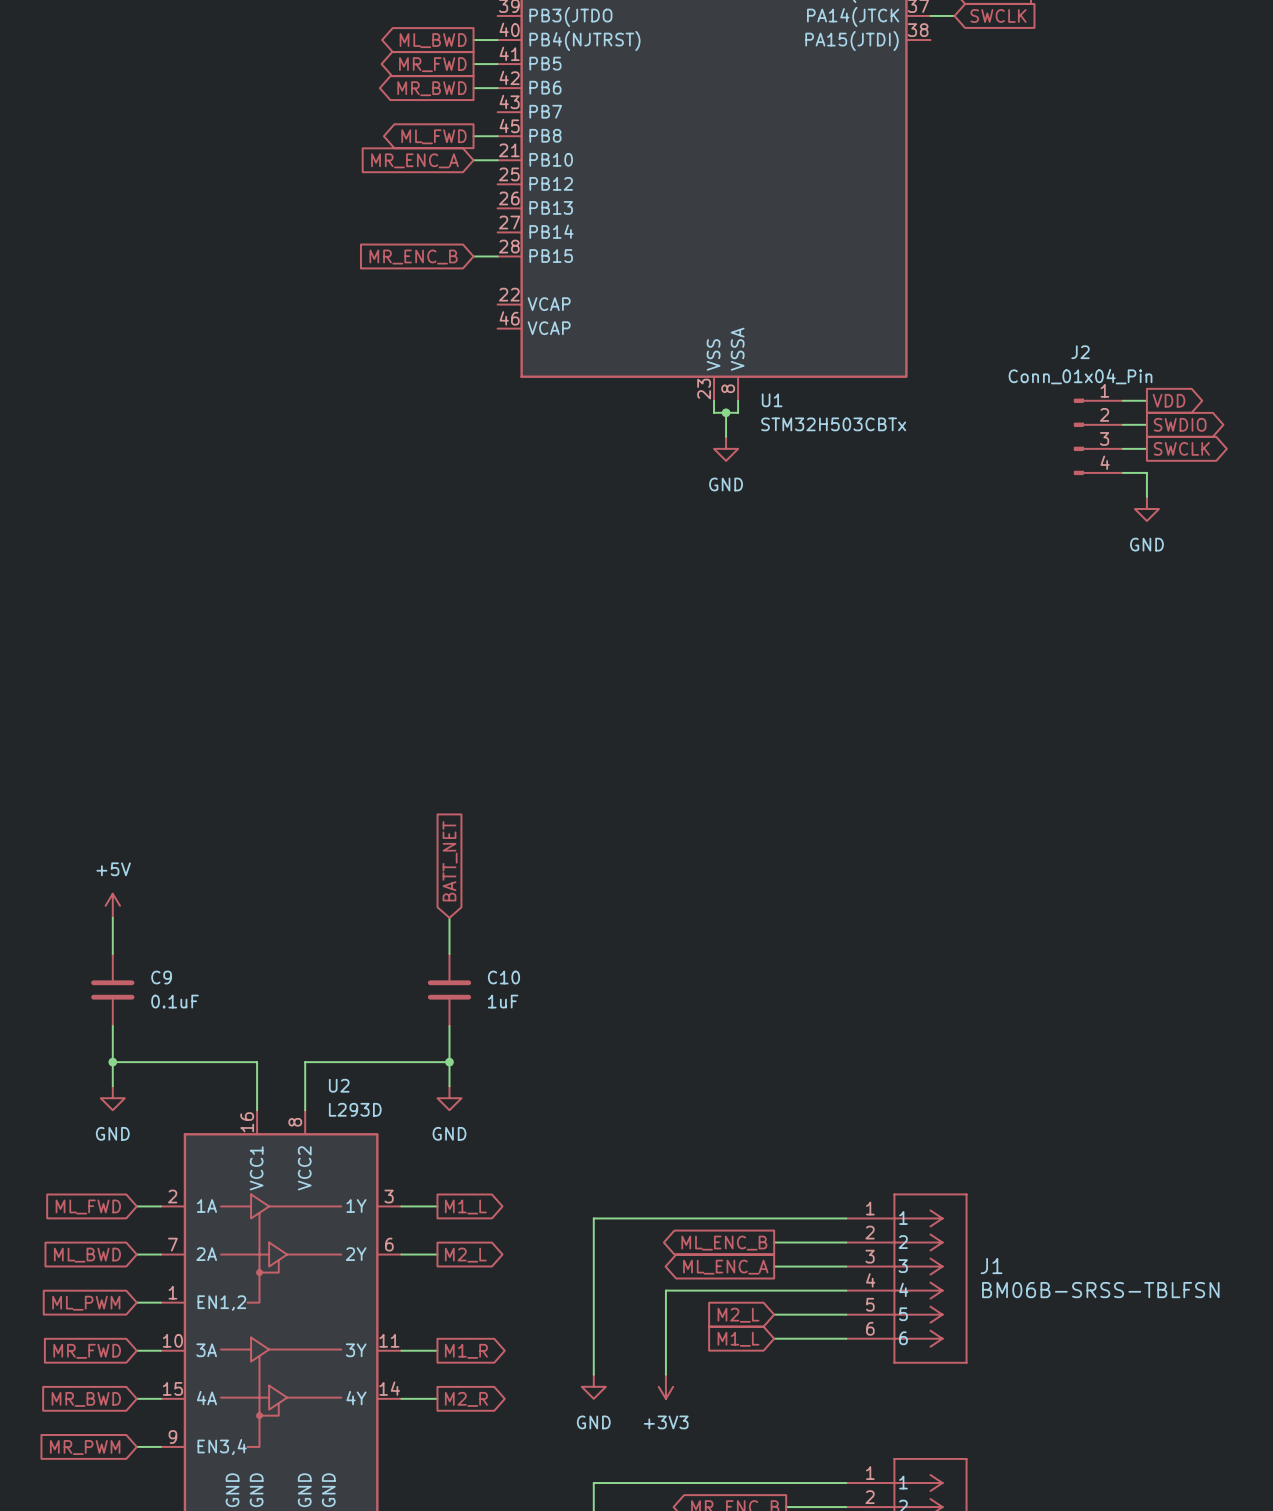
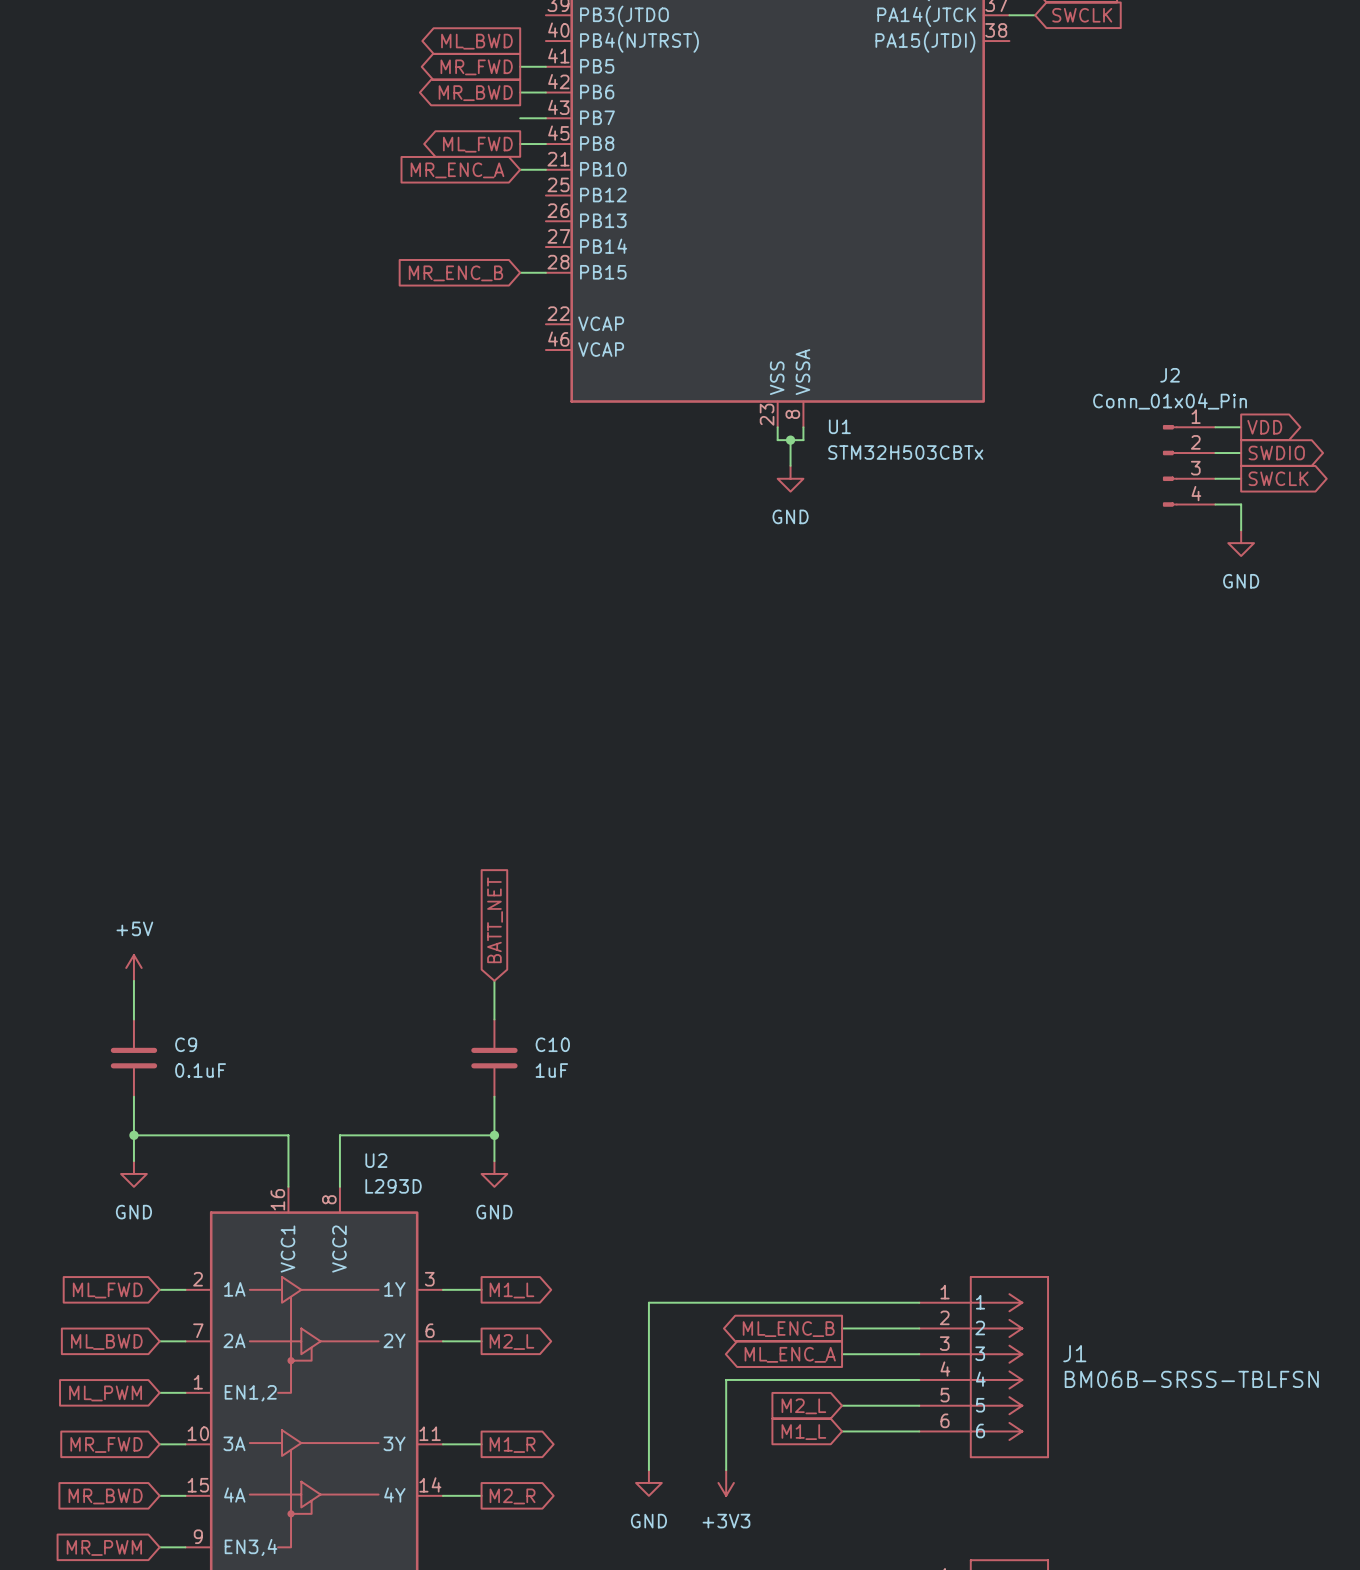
wire: (473, 40) (497, 40) -> (520, 118) (545, 118)

